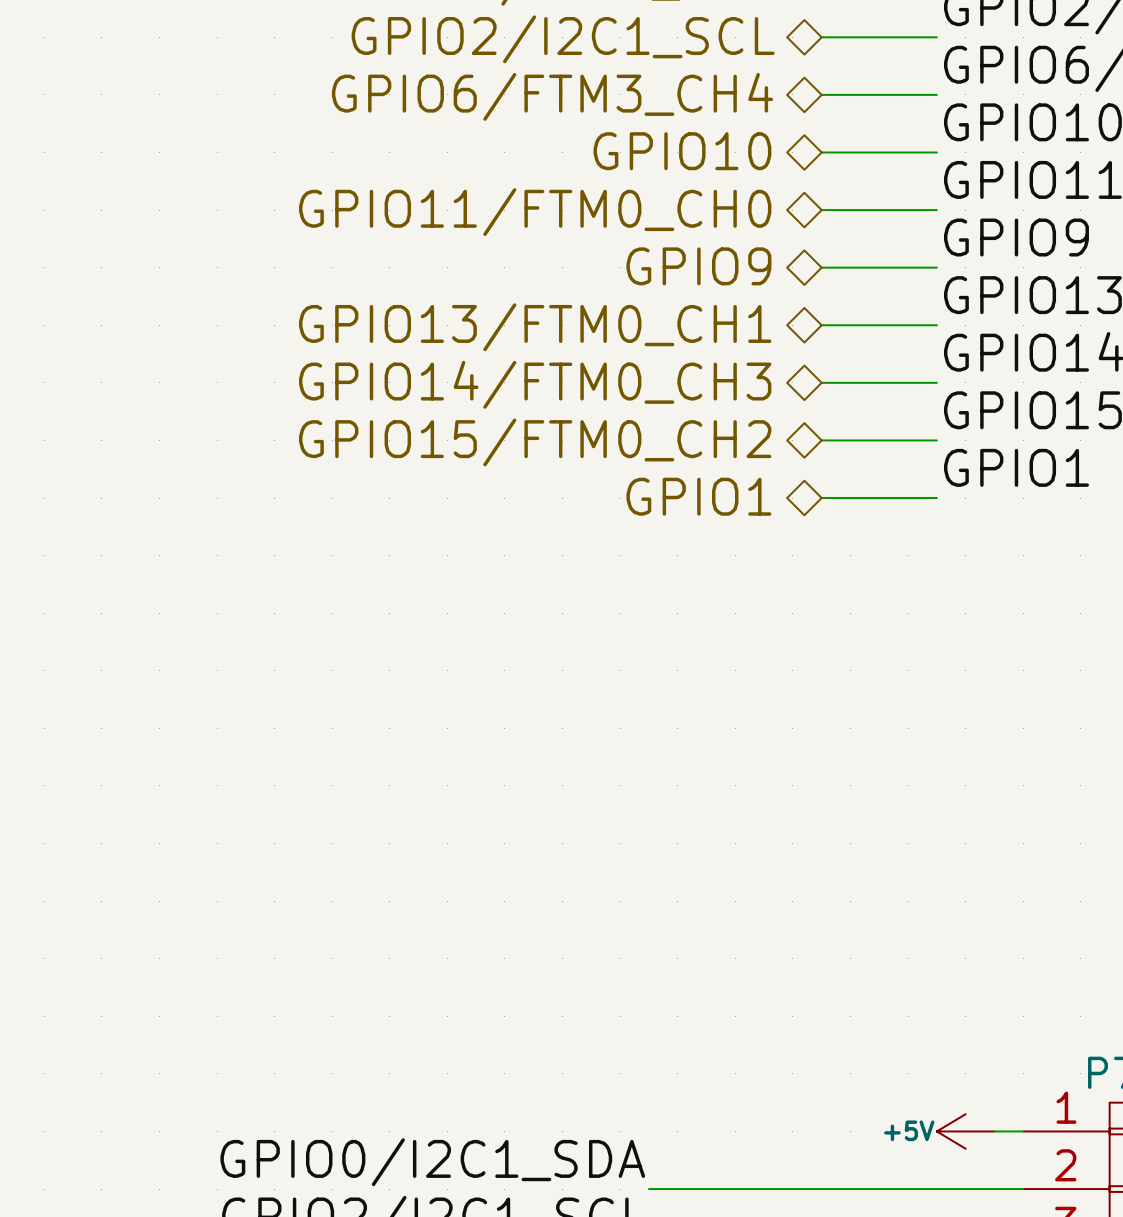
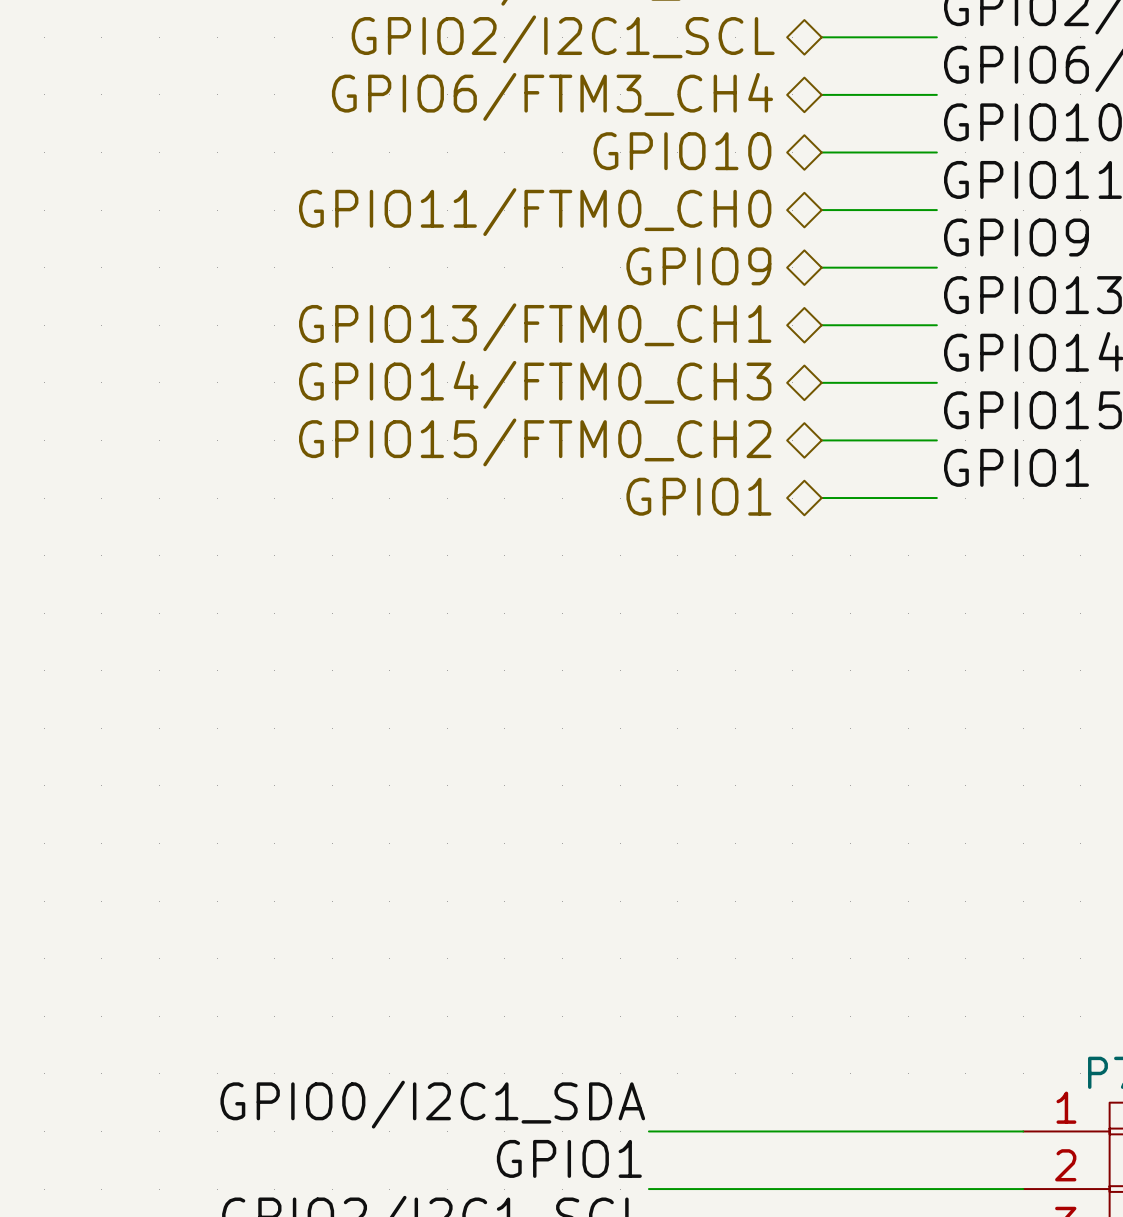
label: none -> GPIO0/I2C1_SDA (432, 1104)
wire: none -> (648, 1131) (994, 1131)
power symbol: +5V (965, 1131) -> none
label: GPIO0/I2C1_SDA (432, 1162) -> GPIO1 (569, 1158)

